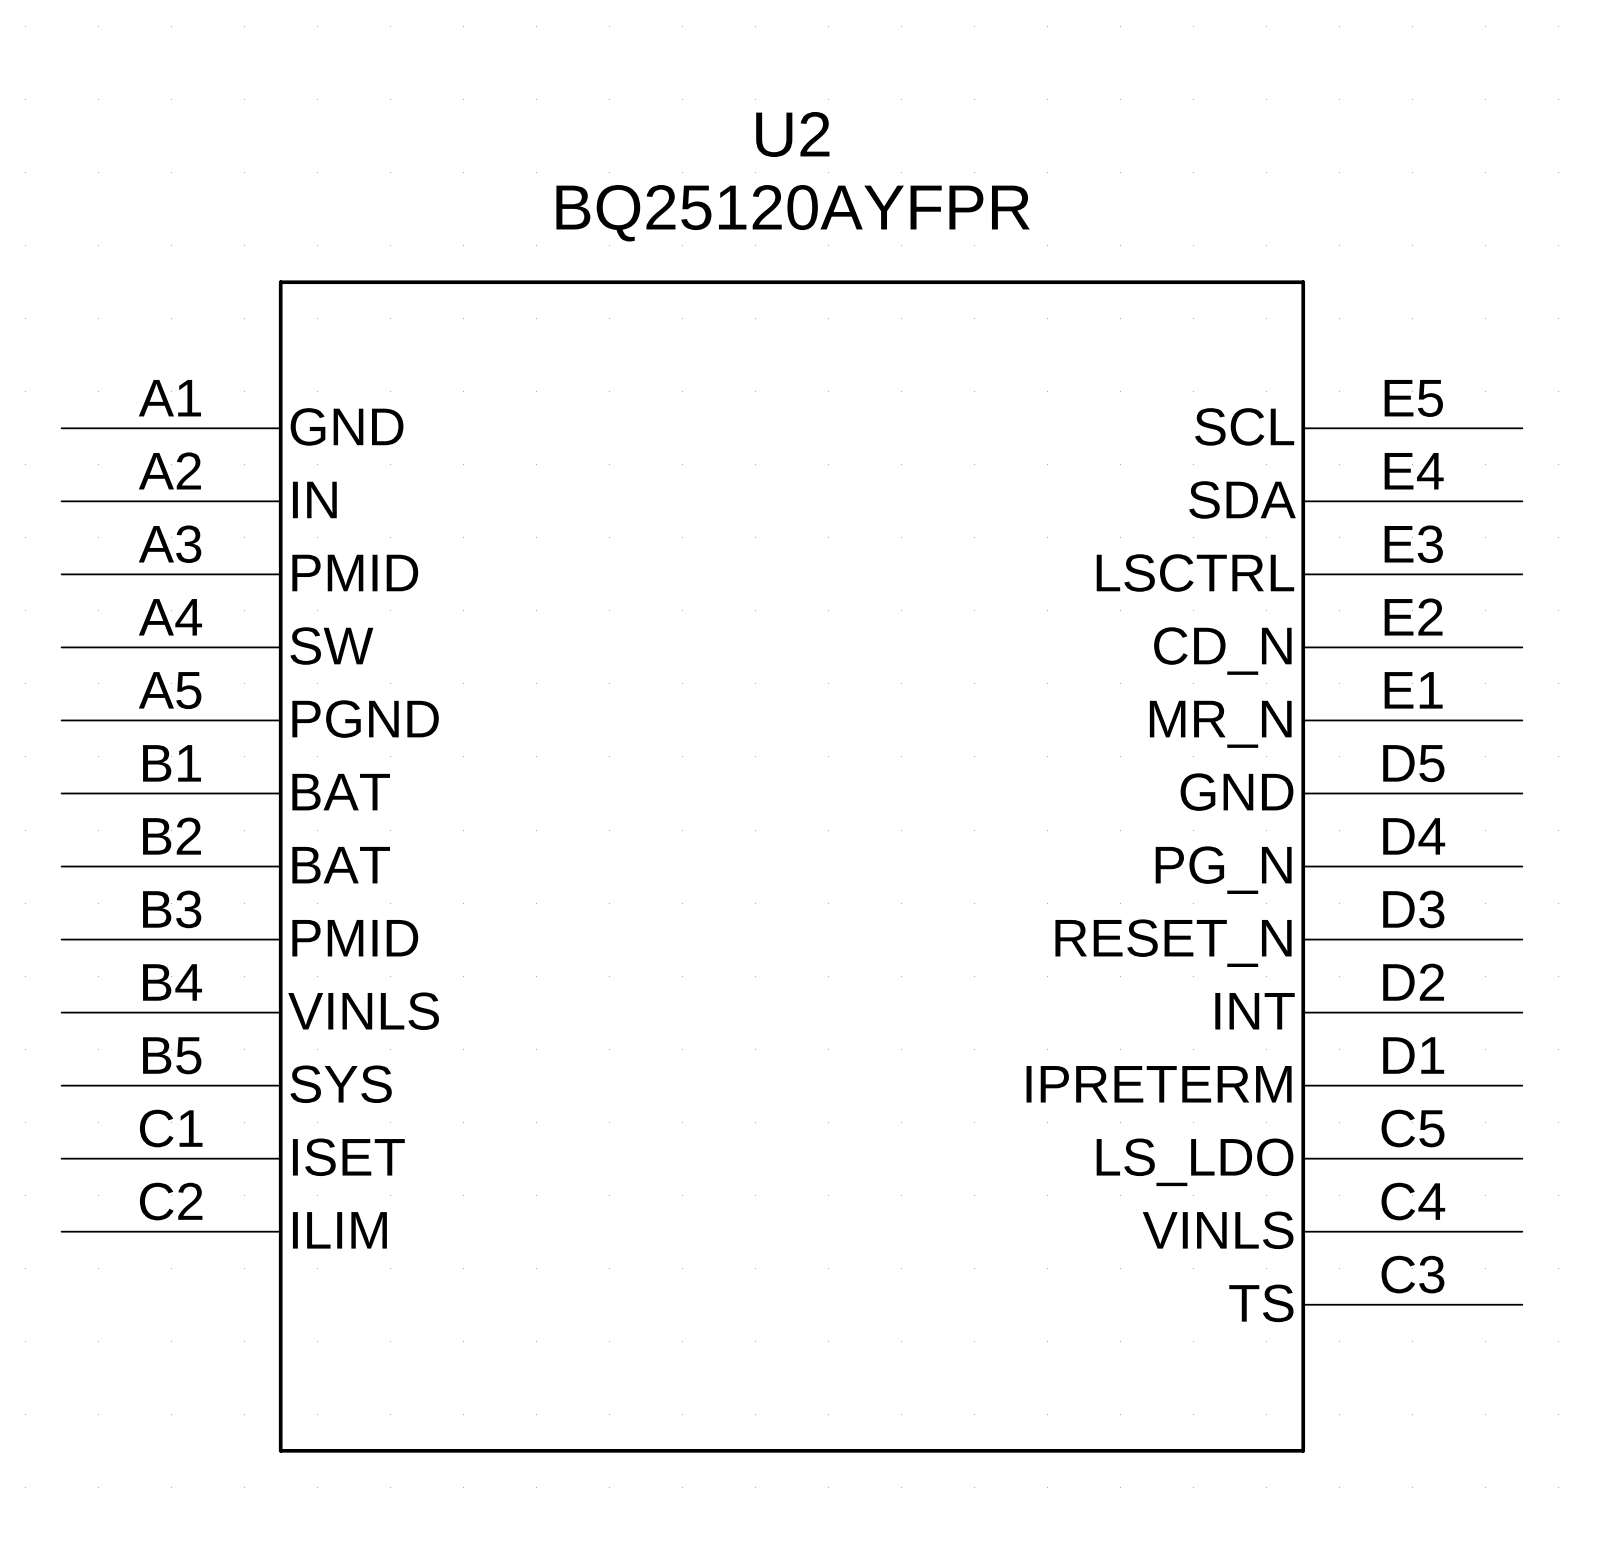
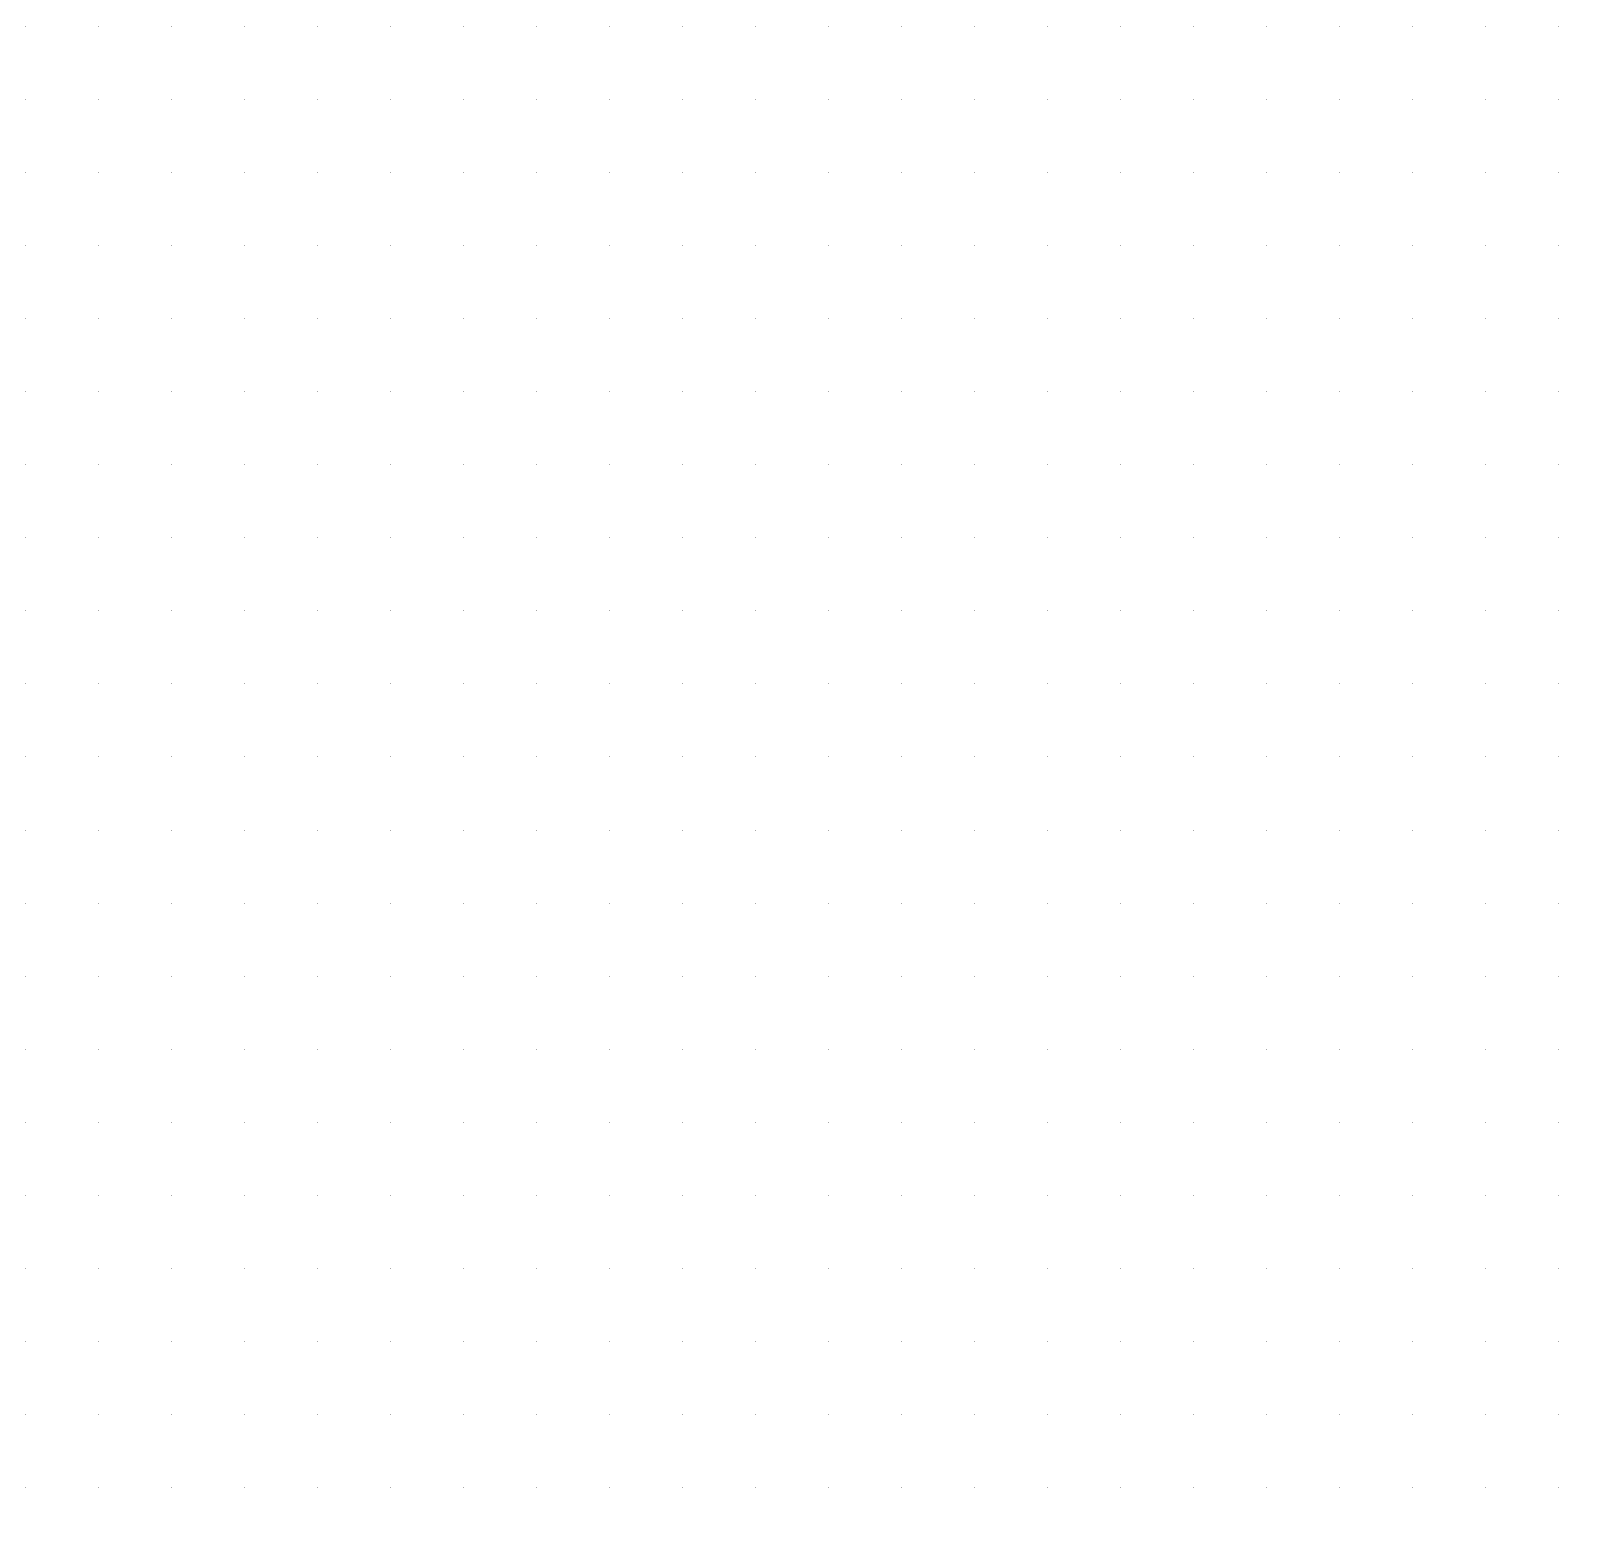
U2: BQ25120AYFPR (791, 866) -> none

